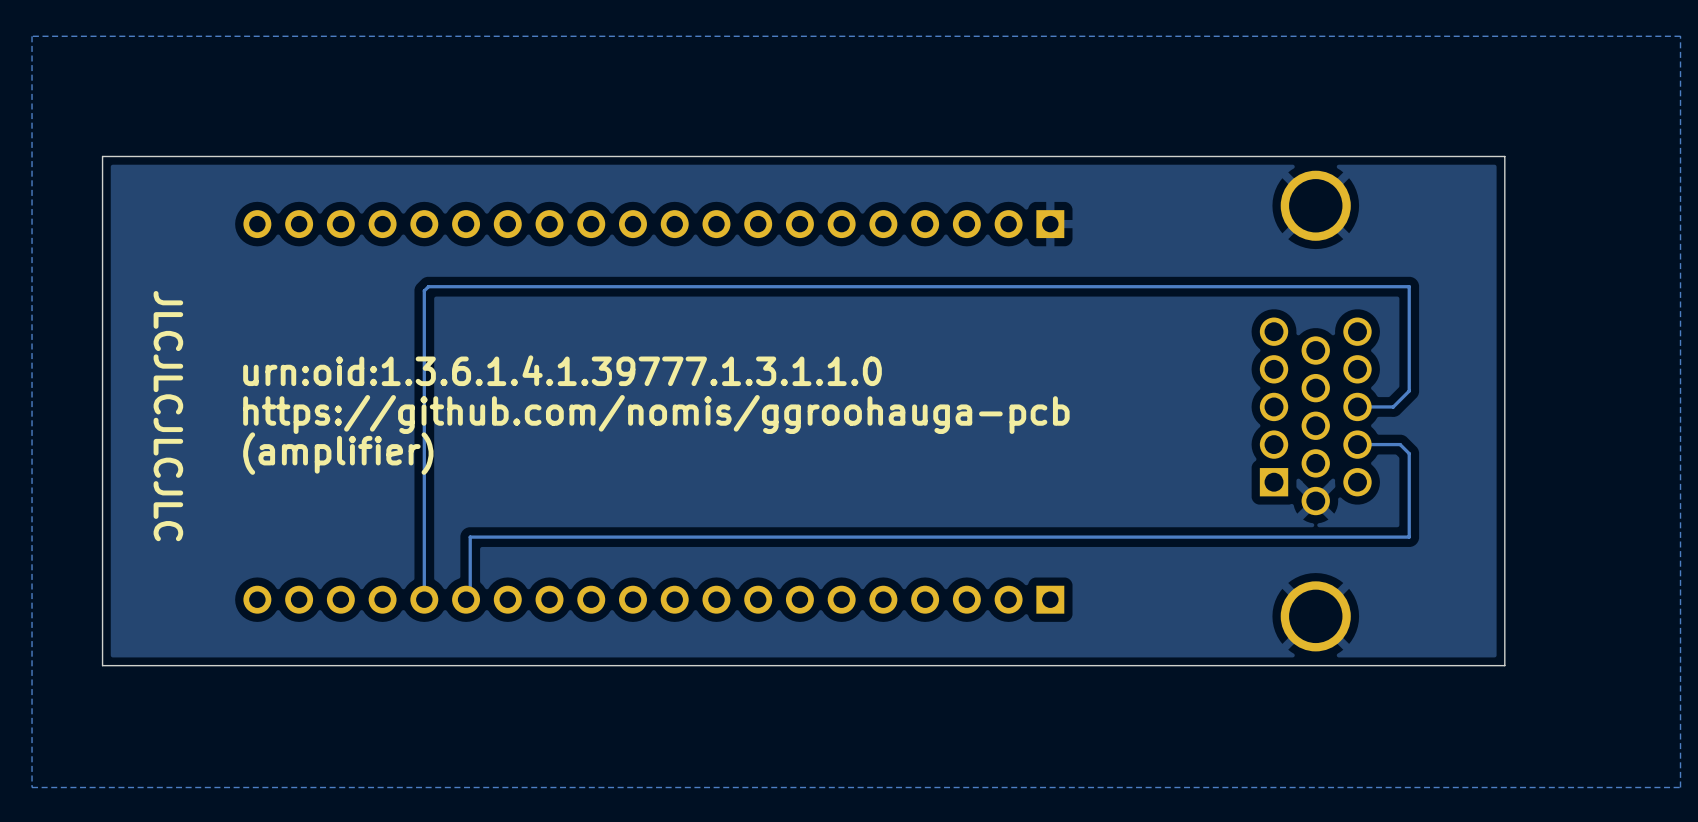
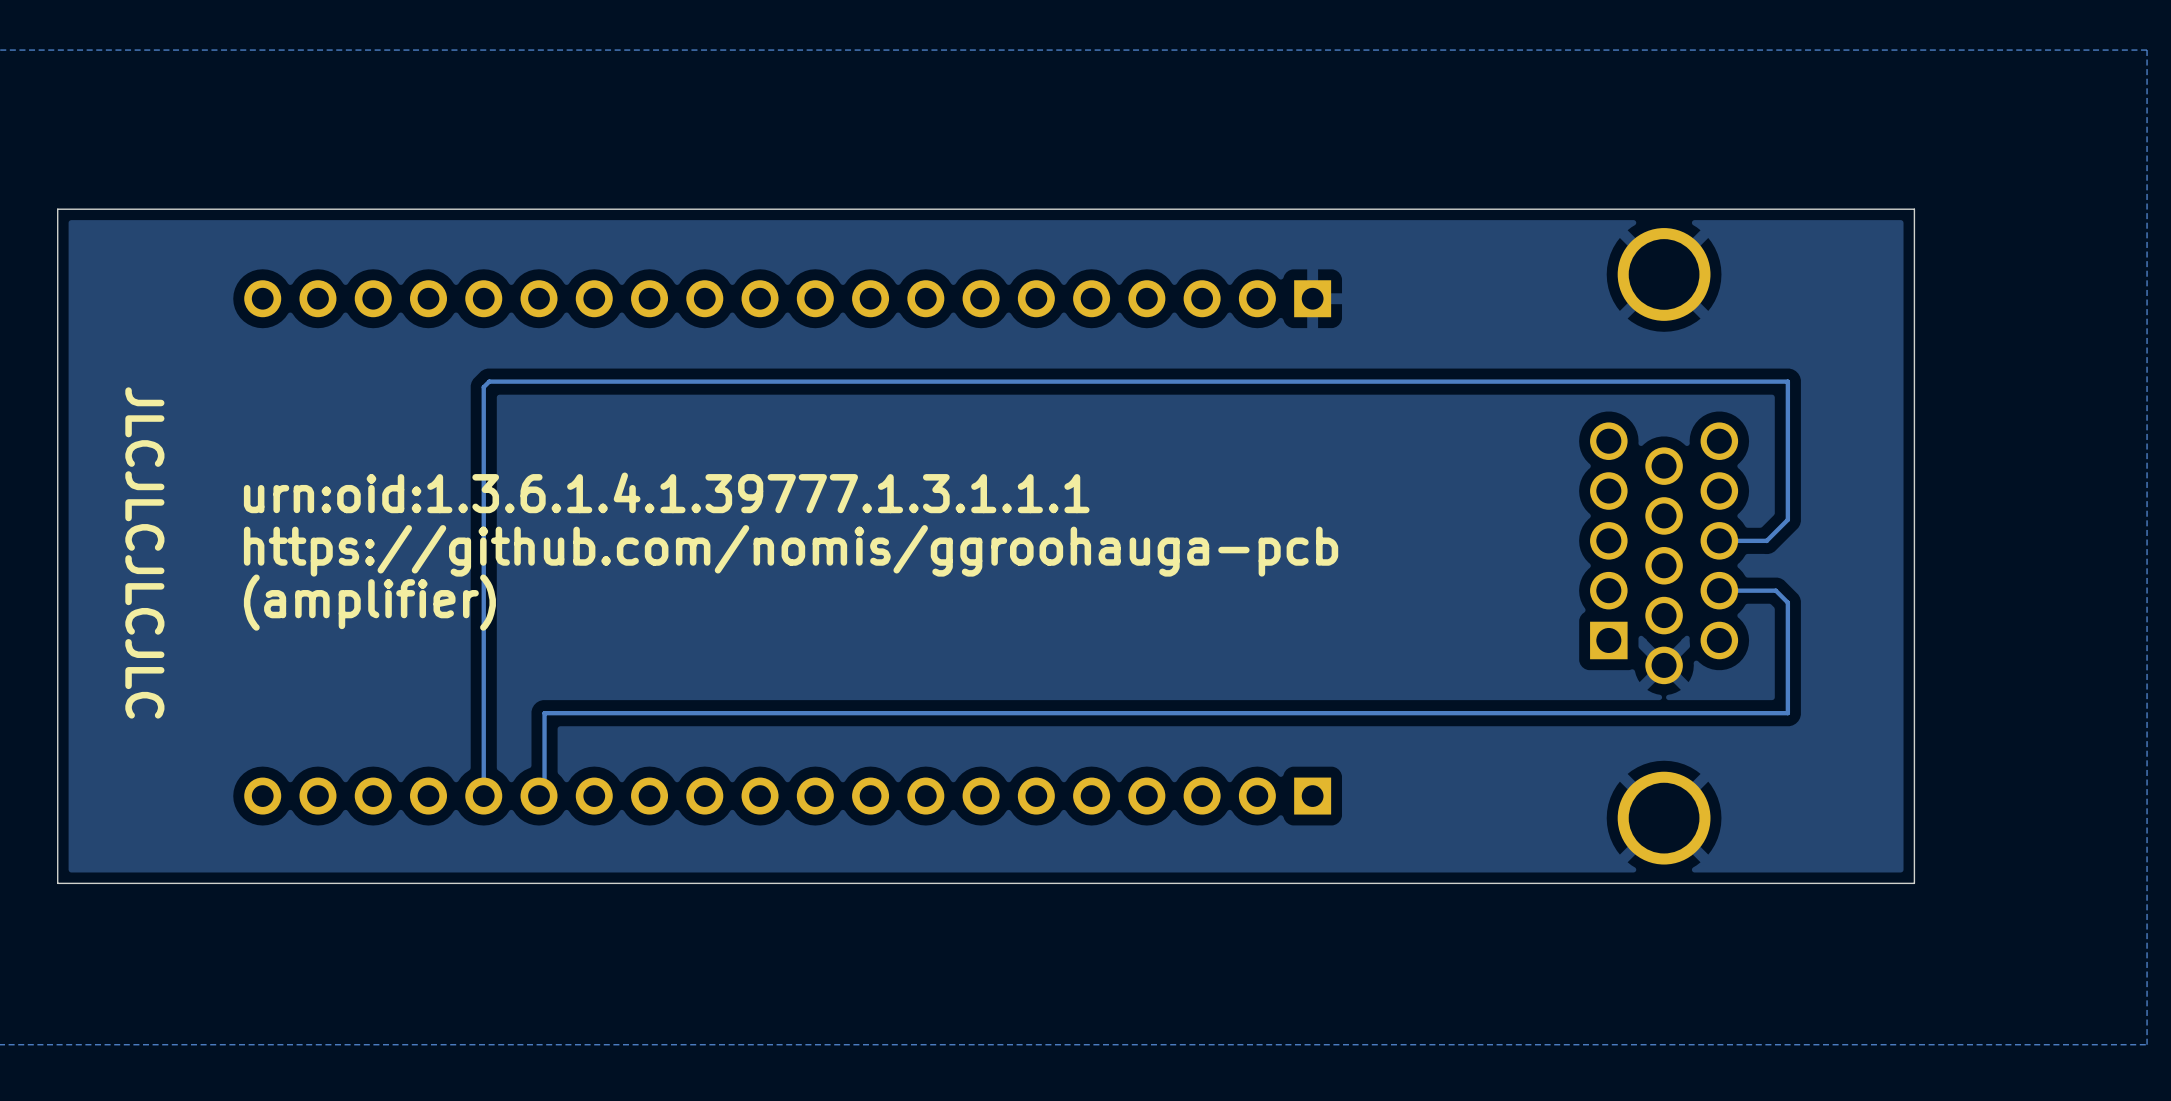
text: urn:oid:1.3.6.1.4.1.39777.1.3.1.1.0 (562, 370) -> urn:oid:1.3.6.1.4.1.39777.1.3.1.1.1 (666, 492)

